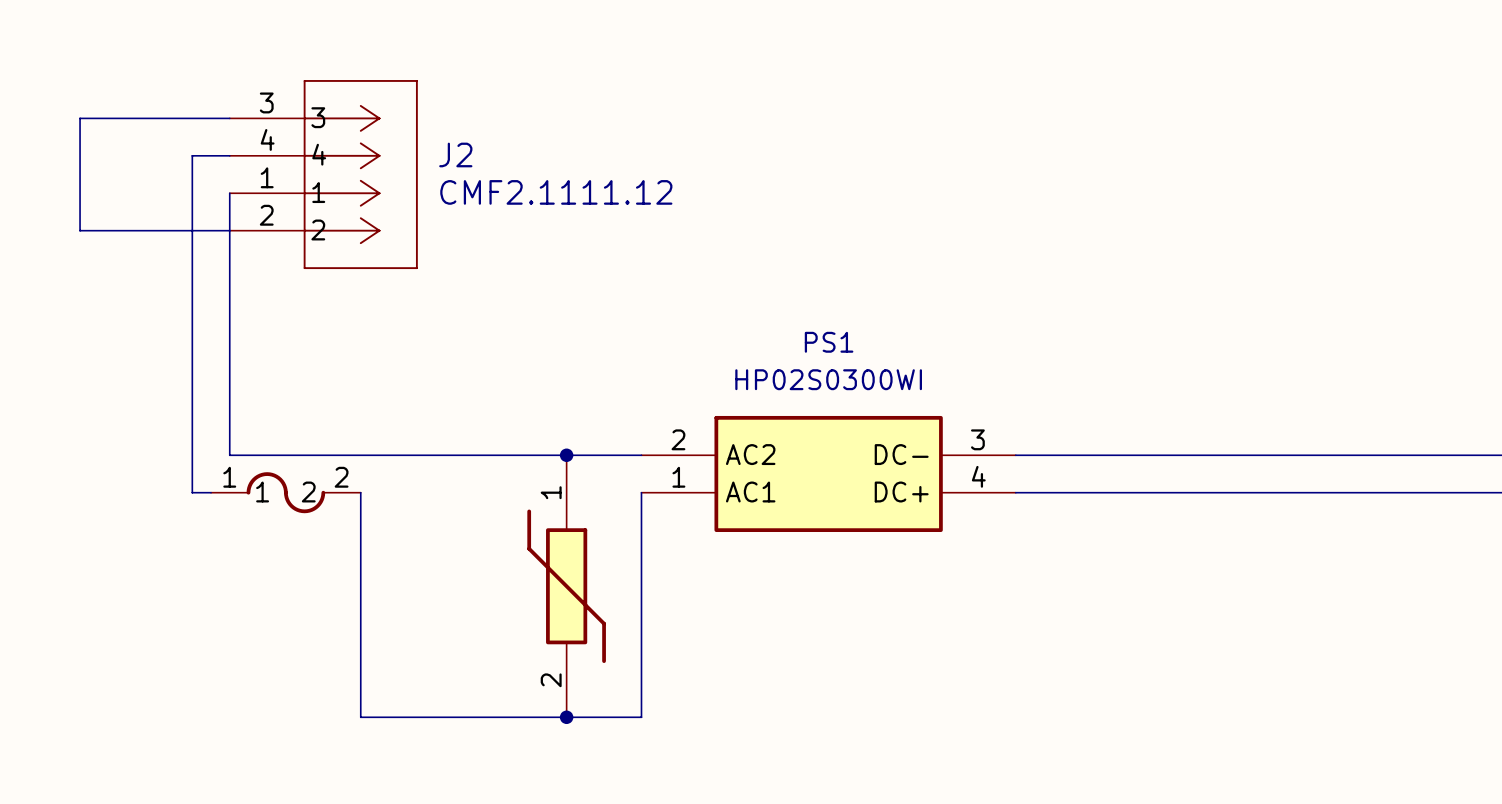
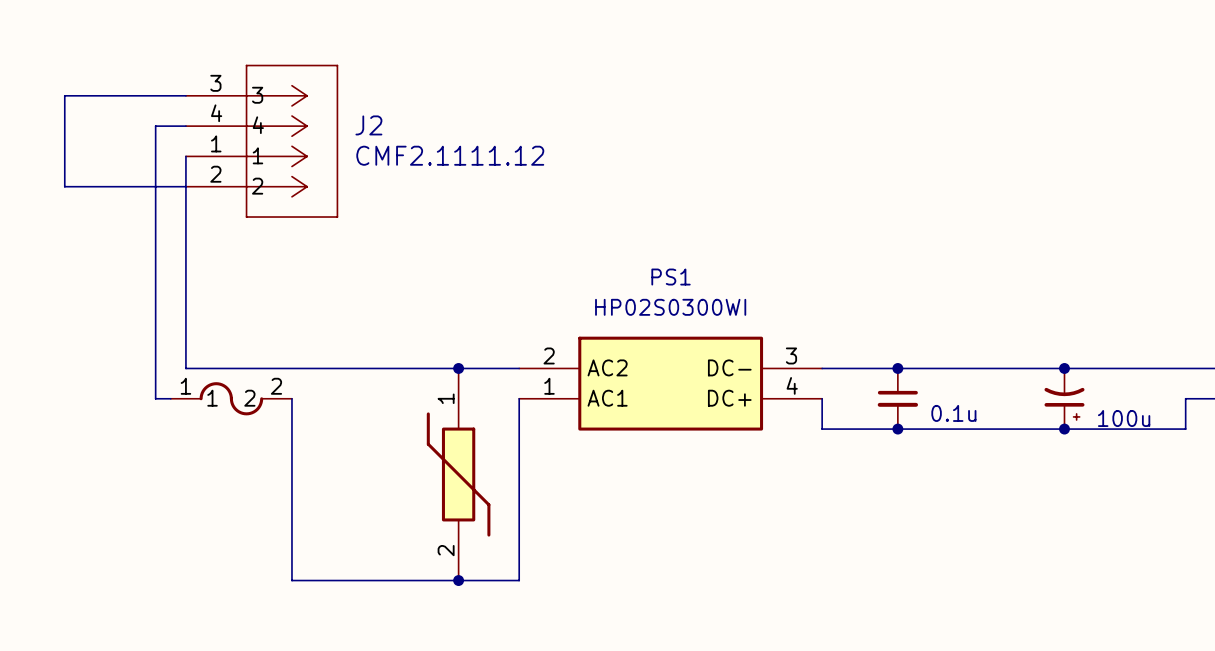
junction: none -> (897, 368)
junction: none -> (1064, 368)
wire: (1015, 492) (1464, 492) -> (822, 398) (822, 429) (1185, 429) (1185, 398)
part: none -> 0.1u (897, 398)
part: none -> 100u (1064, 398)
junction: none -> (897, 429)
junction: none -> (1064, 429)

